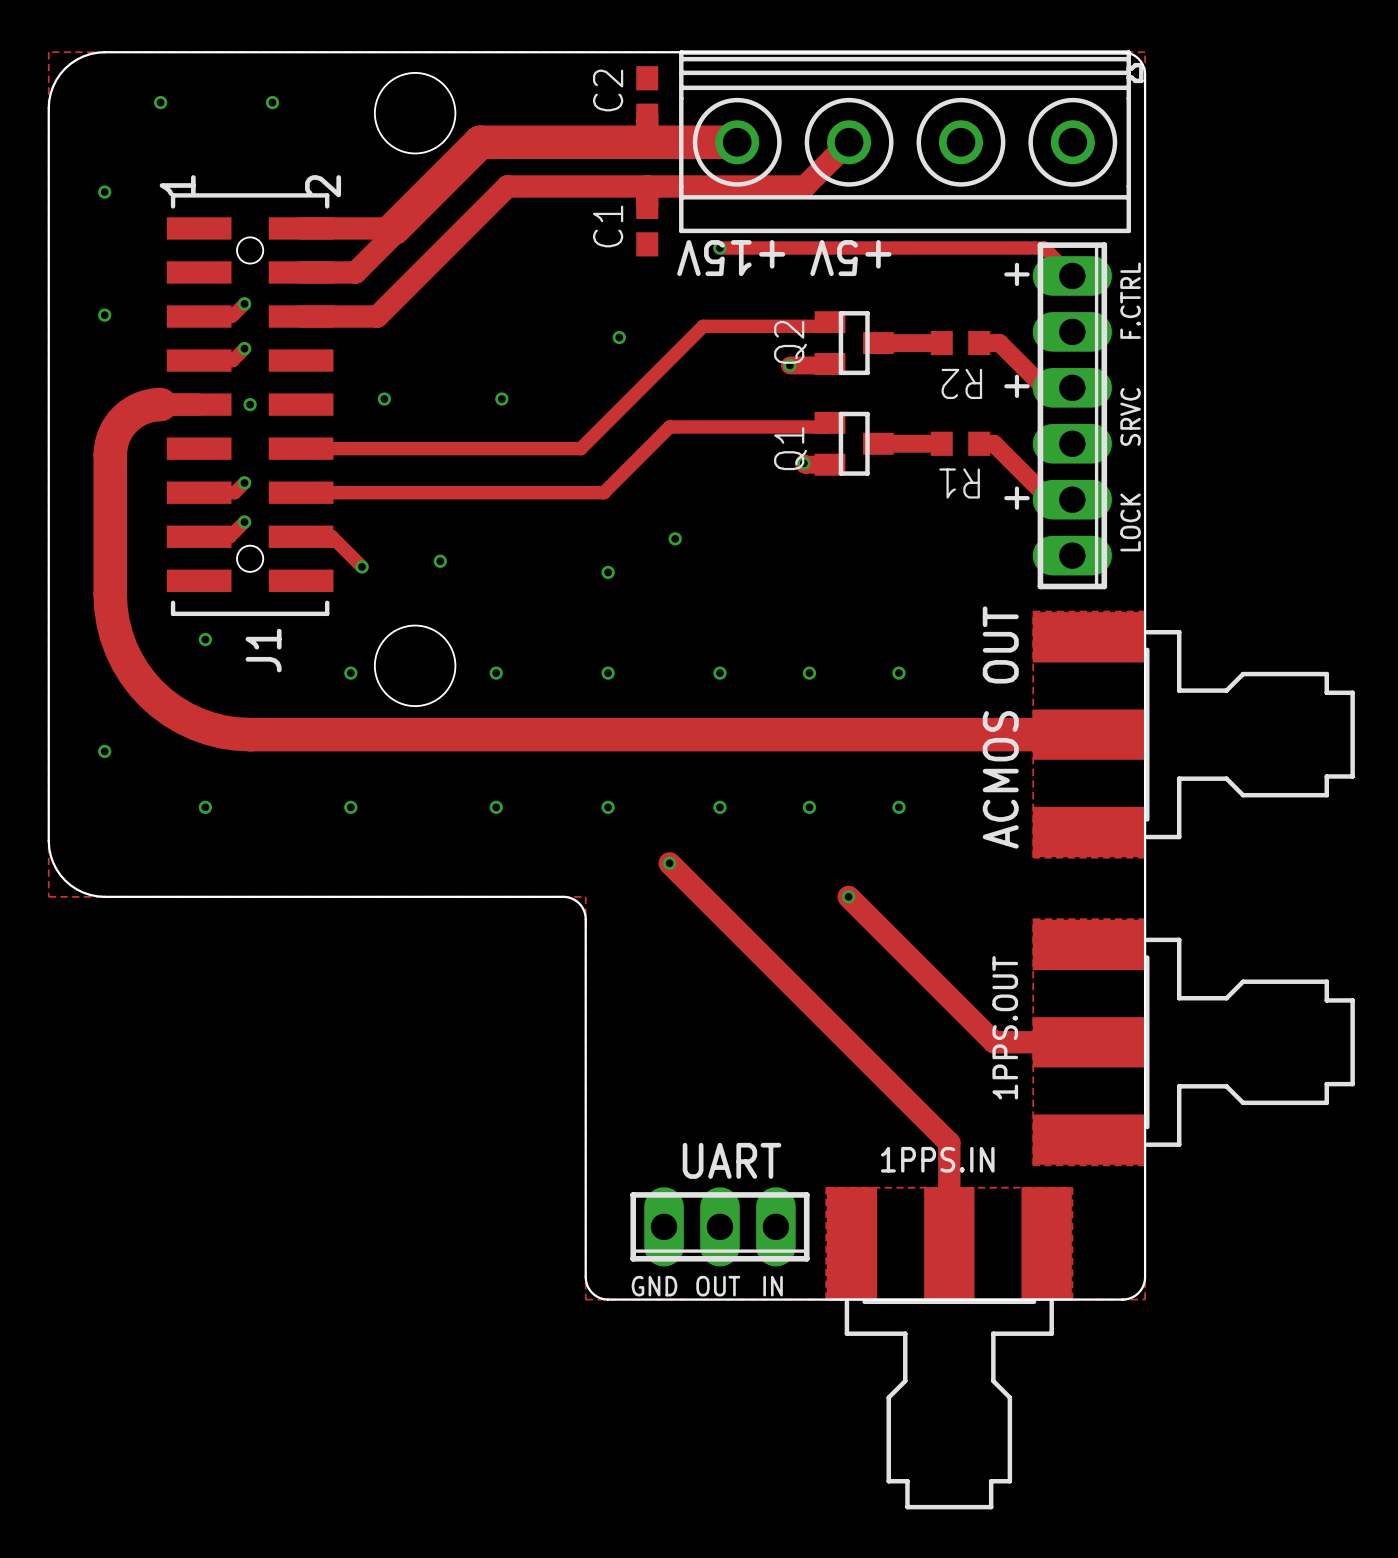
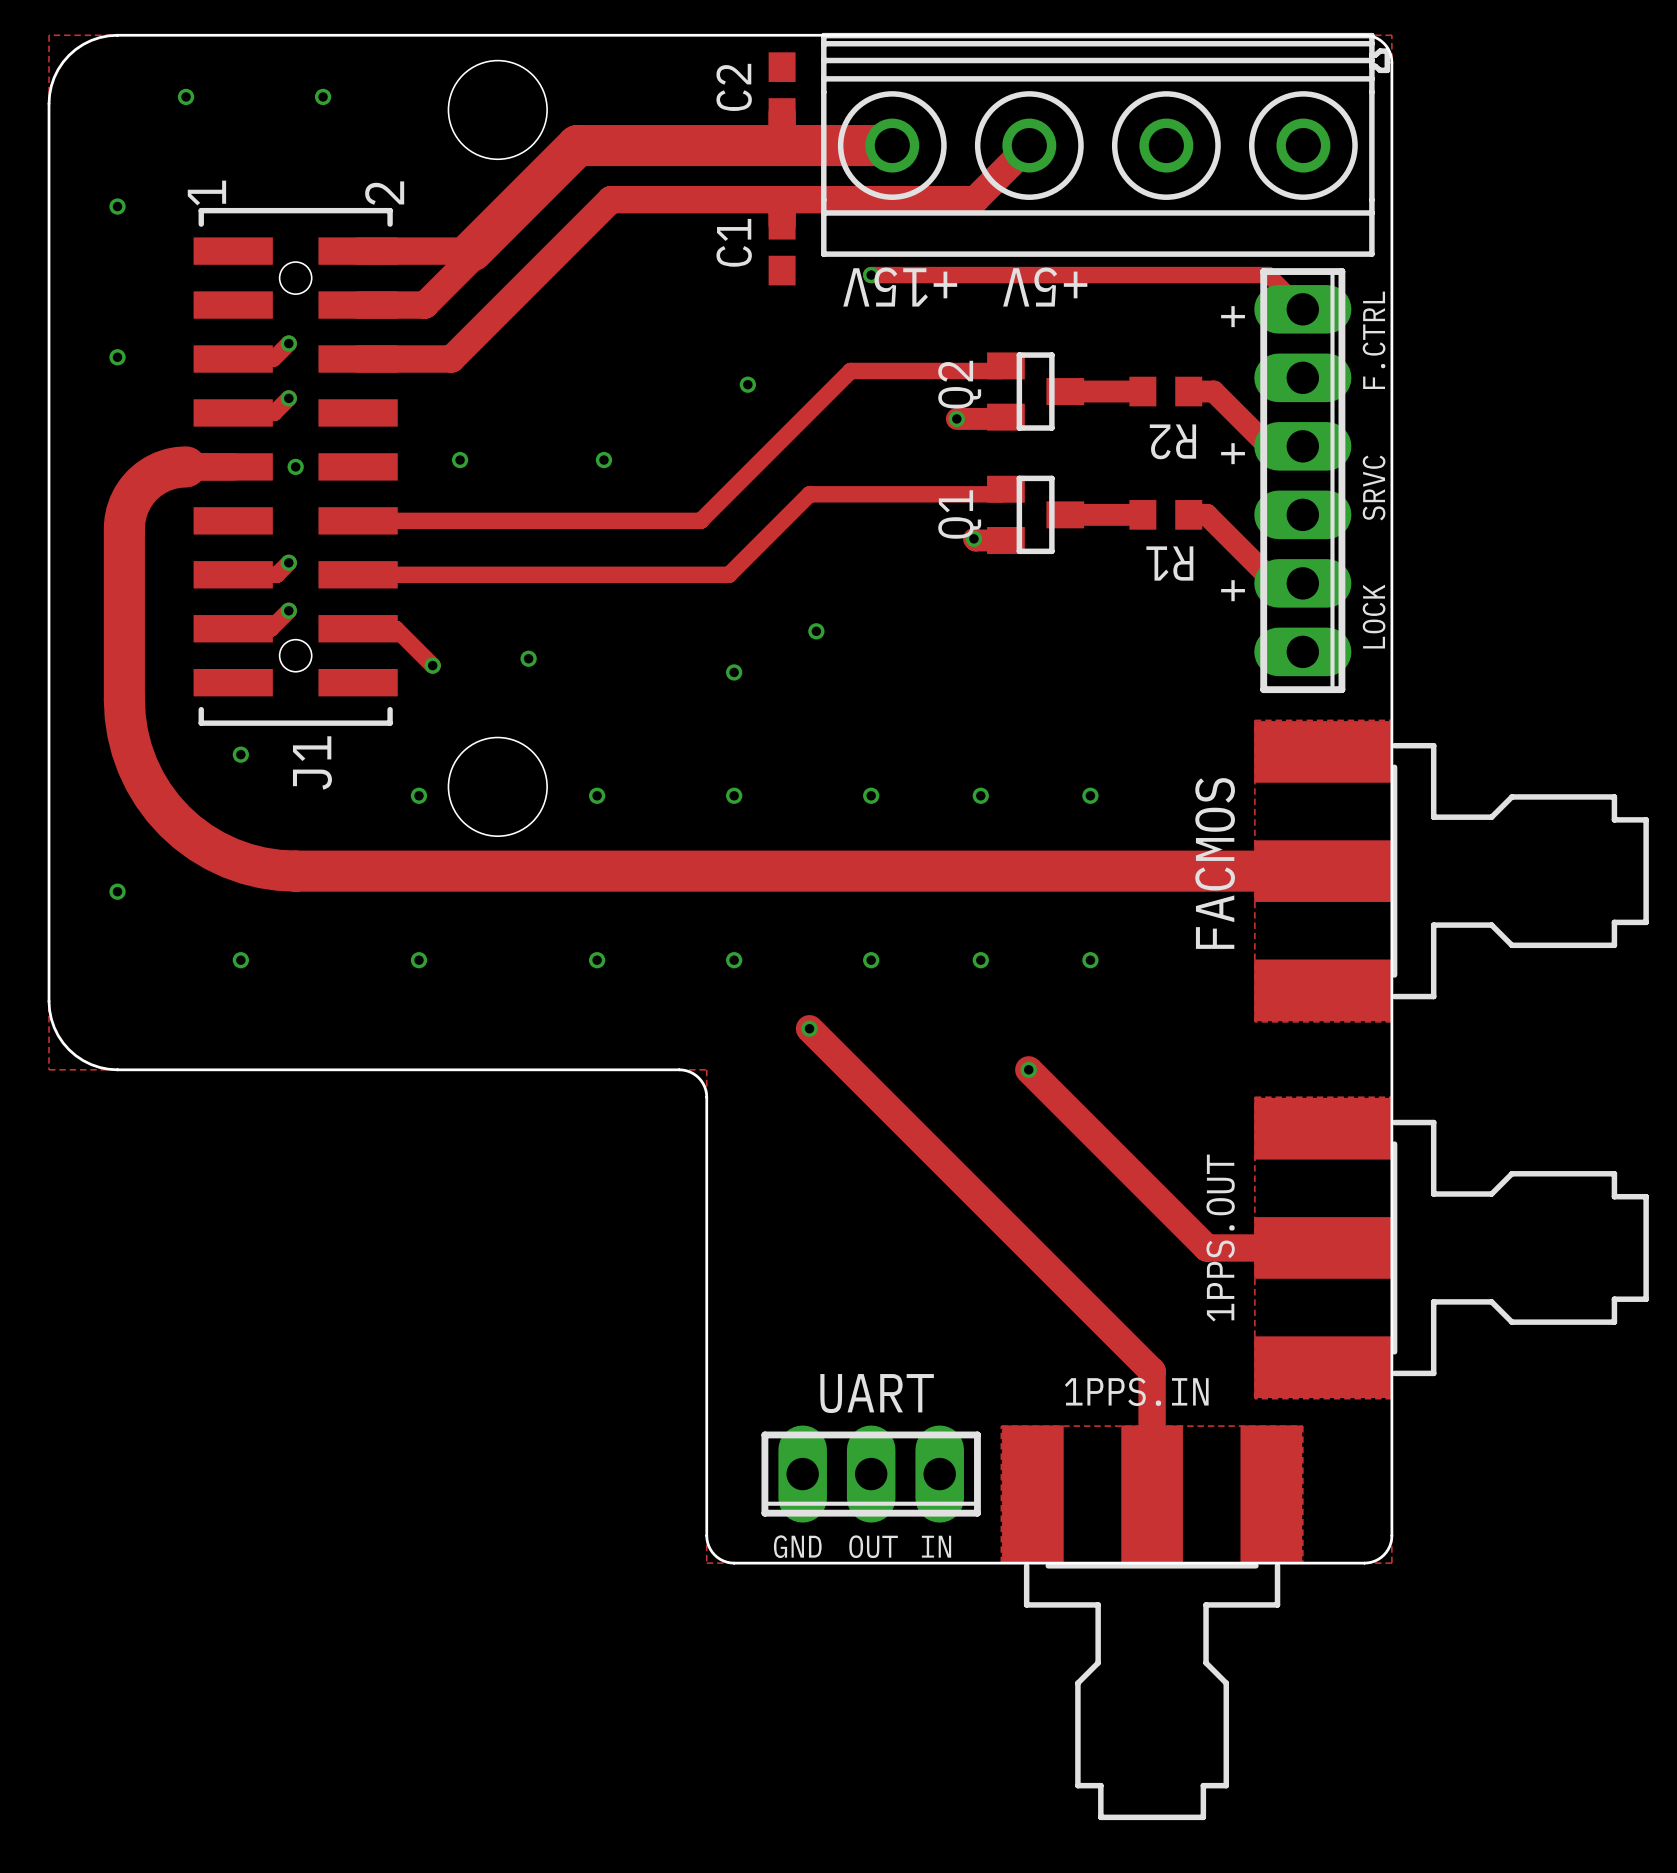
text: ACMOS OUT (1000, 727) -> FACMOS (1215, 863)

